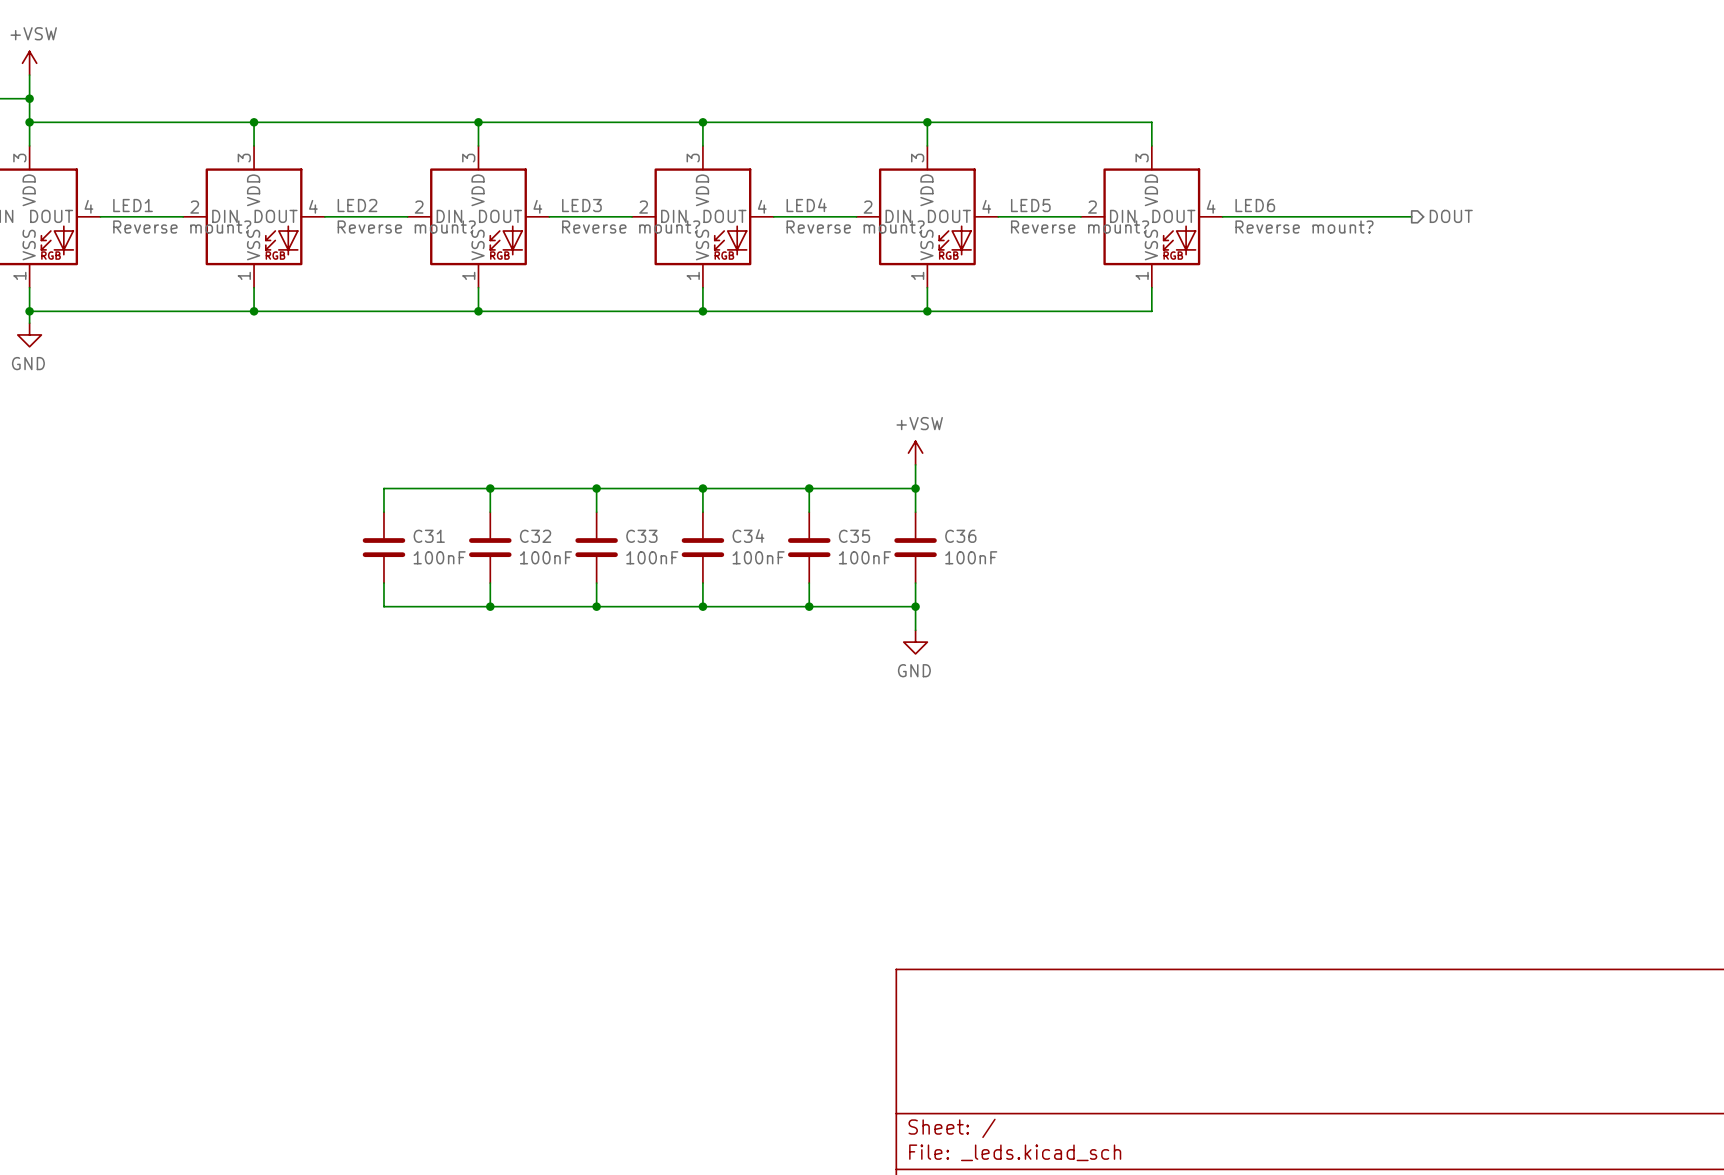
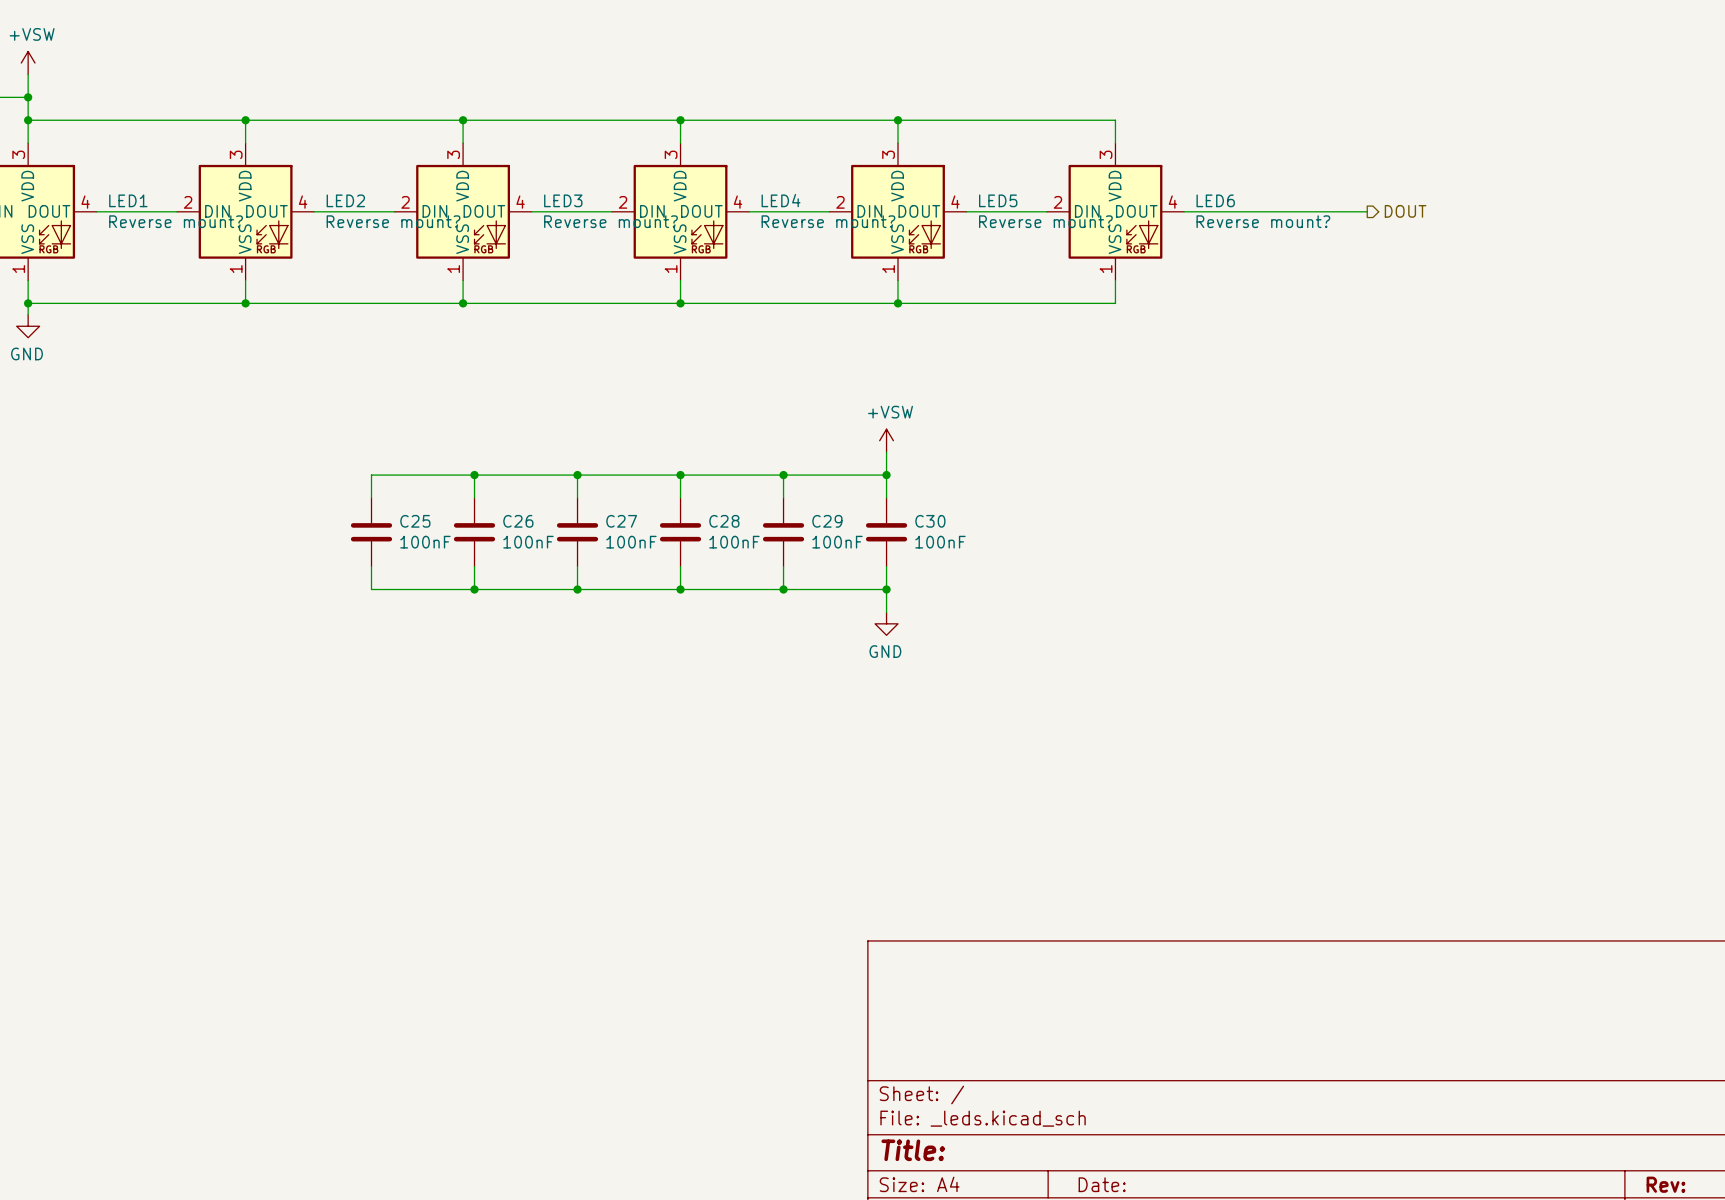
C31 name: C31 (429, 536) -> C25 (415, 521)
C32 name: C32 (535, 536) -> C26 (518, 521)
C33 name: C33 (641, 536) -> C27 (621, 521)
C34 name: C34 (748, 536) -> C28 (724, 521)
C35 name: C35 (854, 536) -> C29 (827, 521)
C36 name: C36 (960, 536) -> C30 (930, 521)

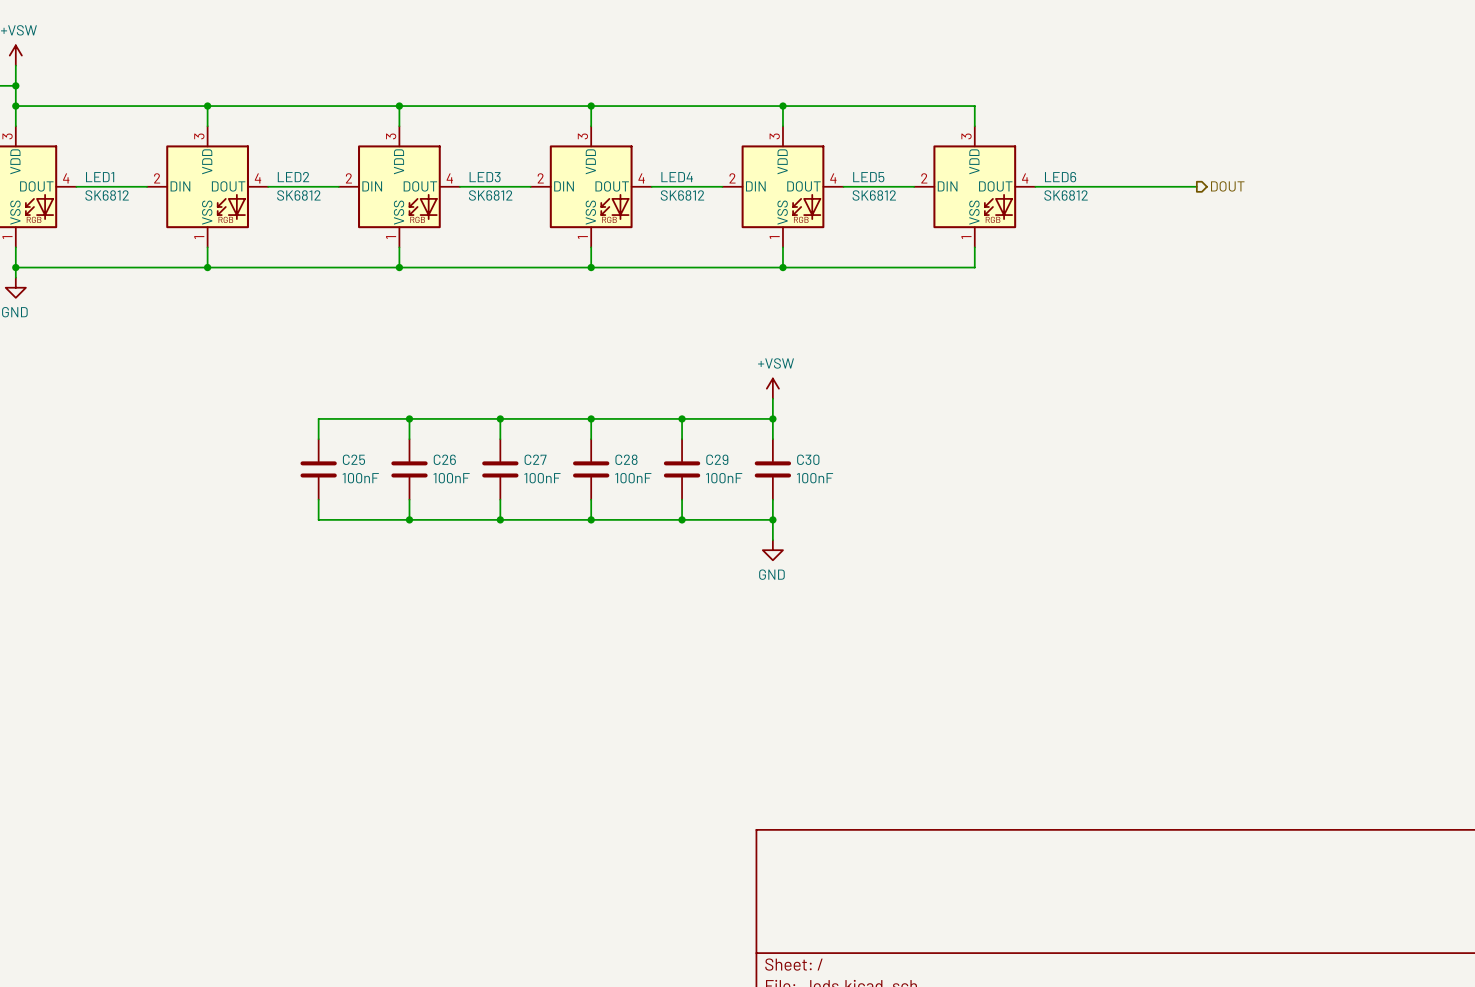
LED1 value: Reverse mount? (176, 221) -> SK6812 (107, 195)
LED2 value: Reverse mount? (393, 221) -> SK6812 (298, 195)
LED3 value: Reverse mount? (610, 221) -> SK6812 (490, 195)
LED4 value: Reverse mount? (828, 221) -> SK6812 (682, 195)
LED5 value: Reverse mount? (1045, 221) -> SK6812 (874, 195)
LED6 value: Reverse mount? (1263, 221) -> SK6812 (1066, 195)

